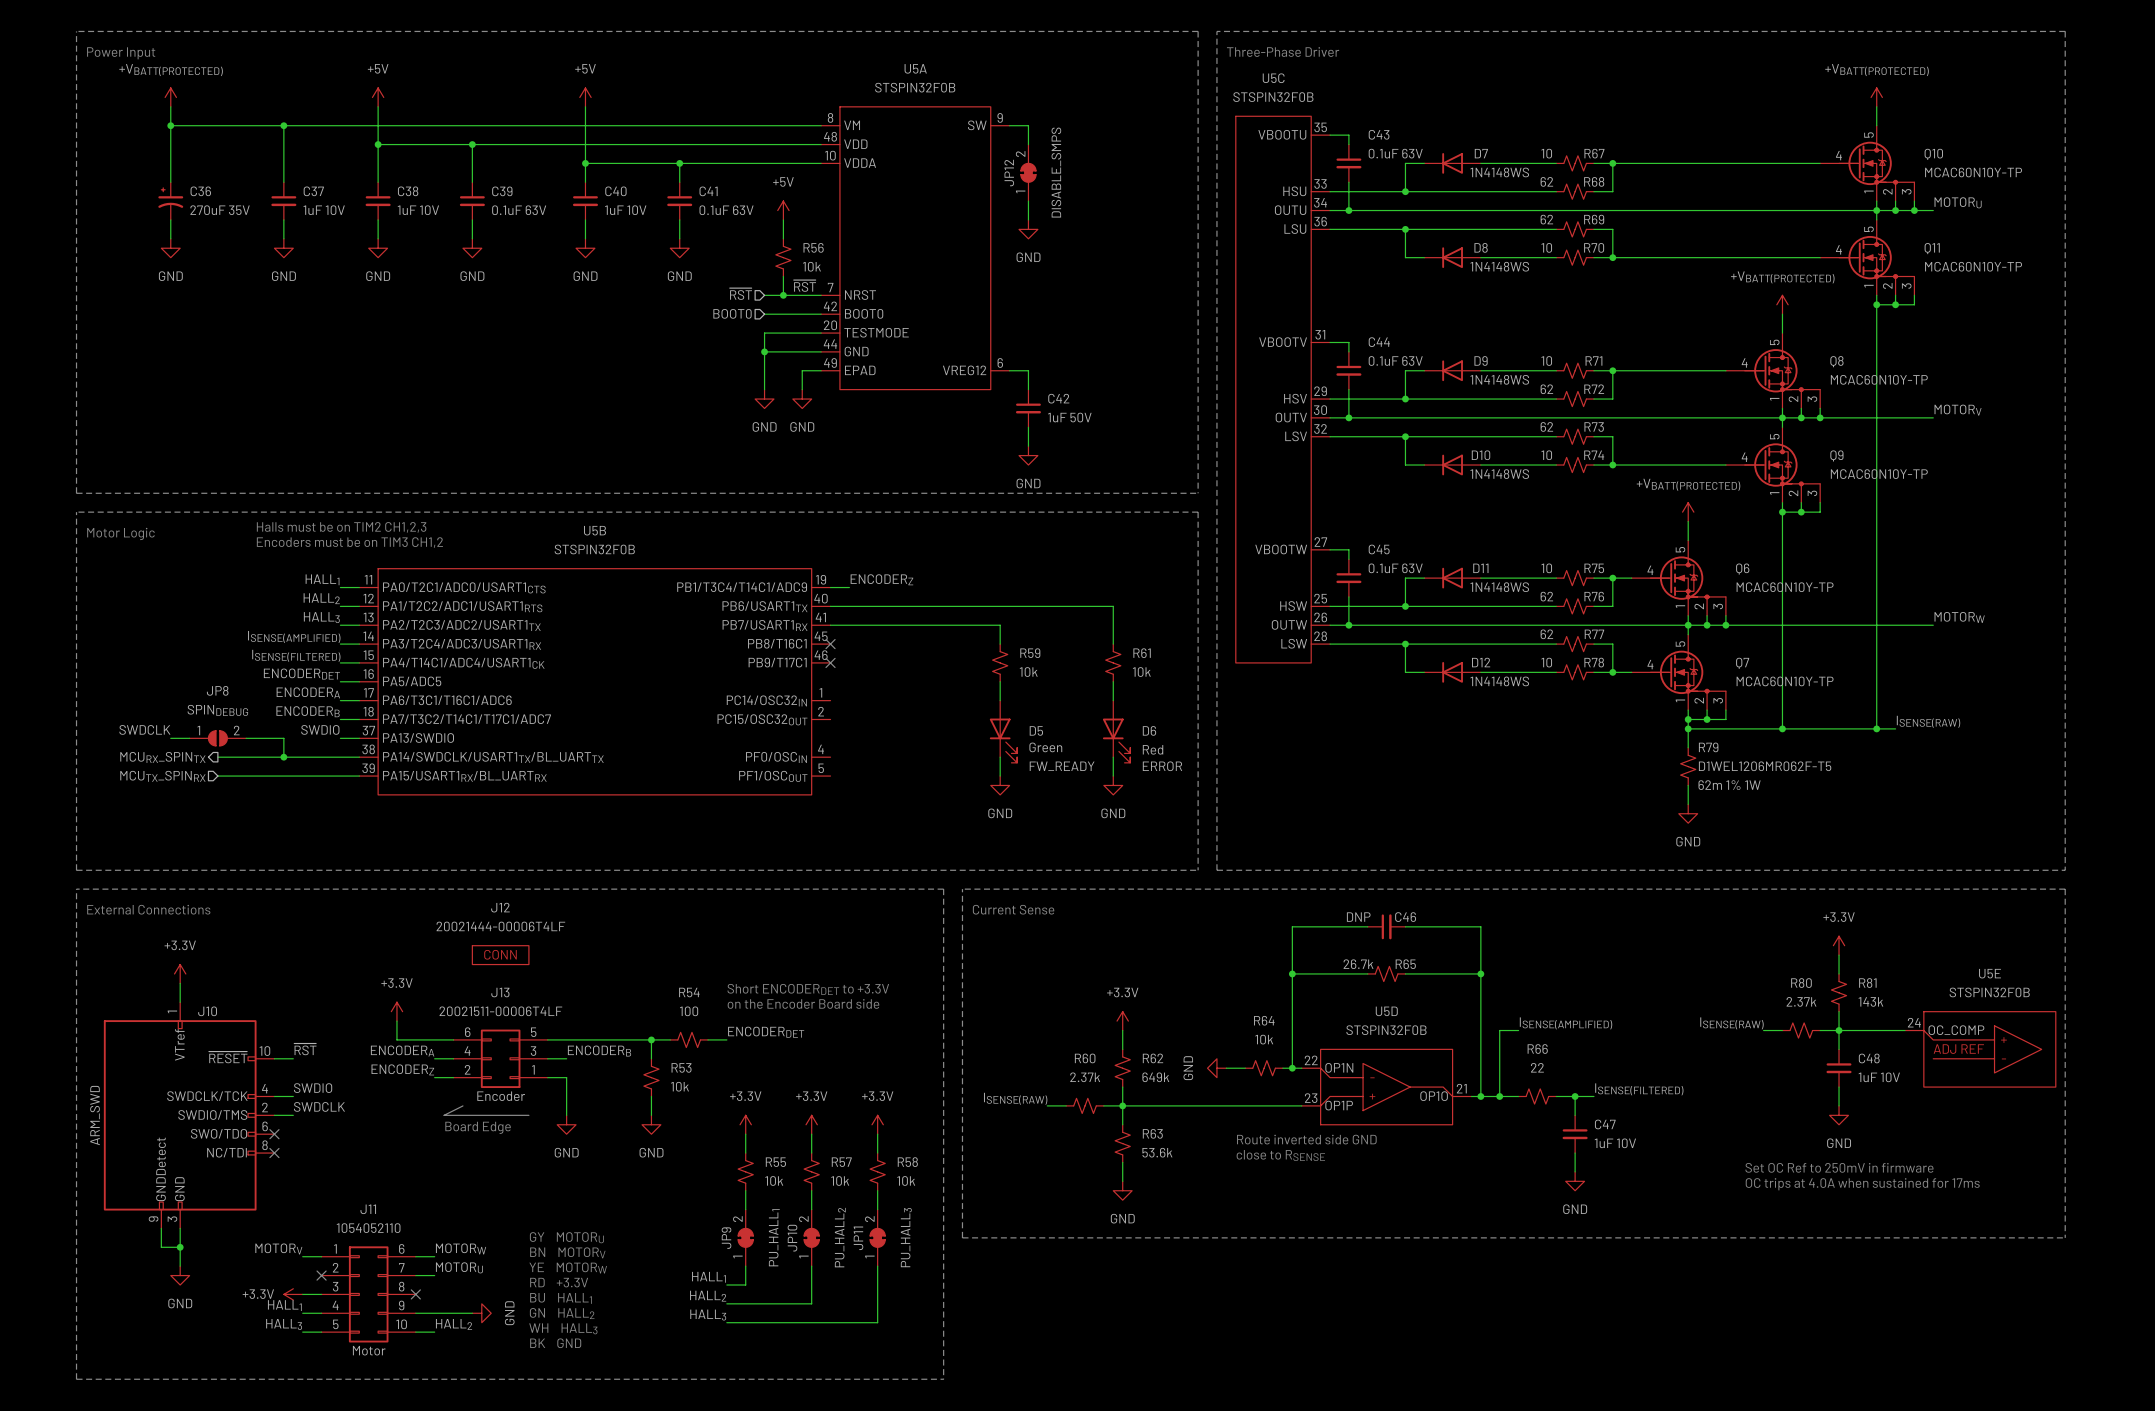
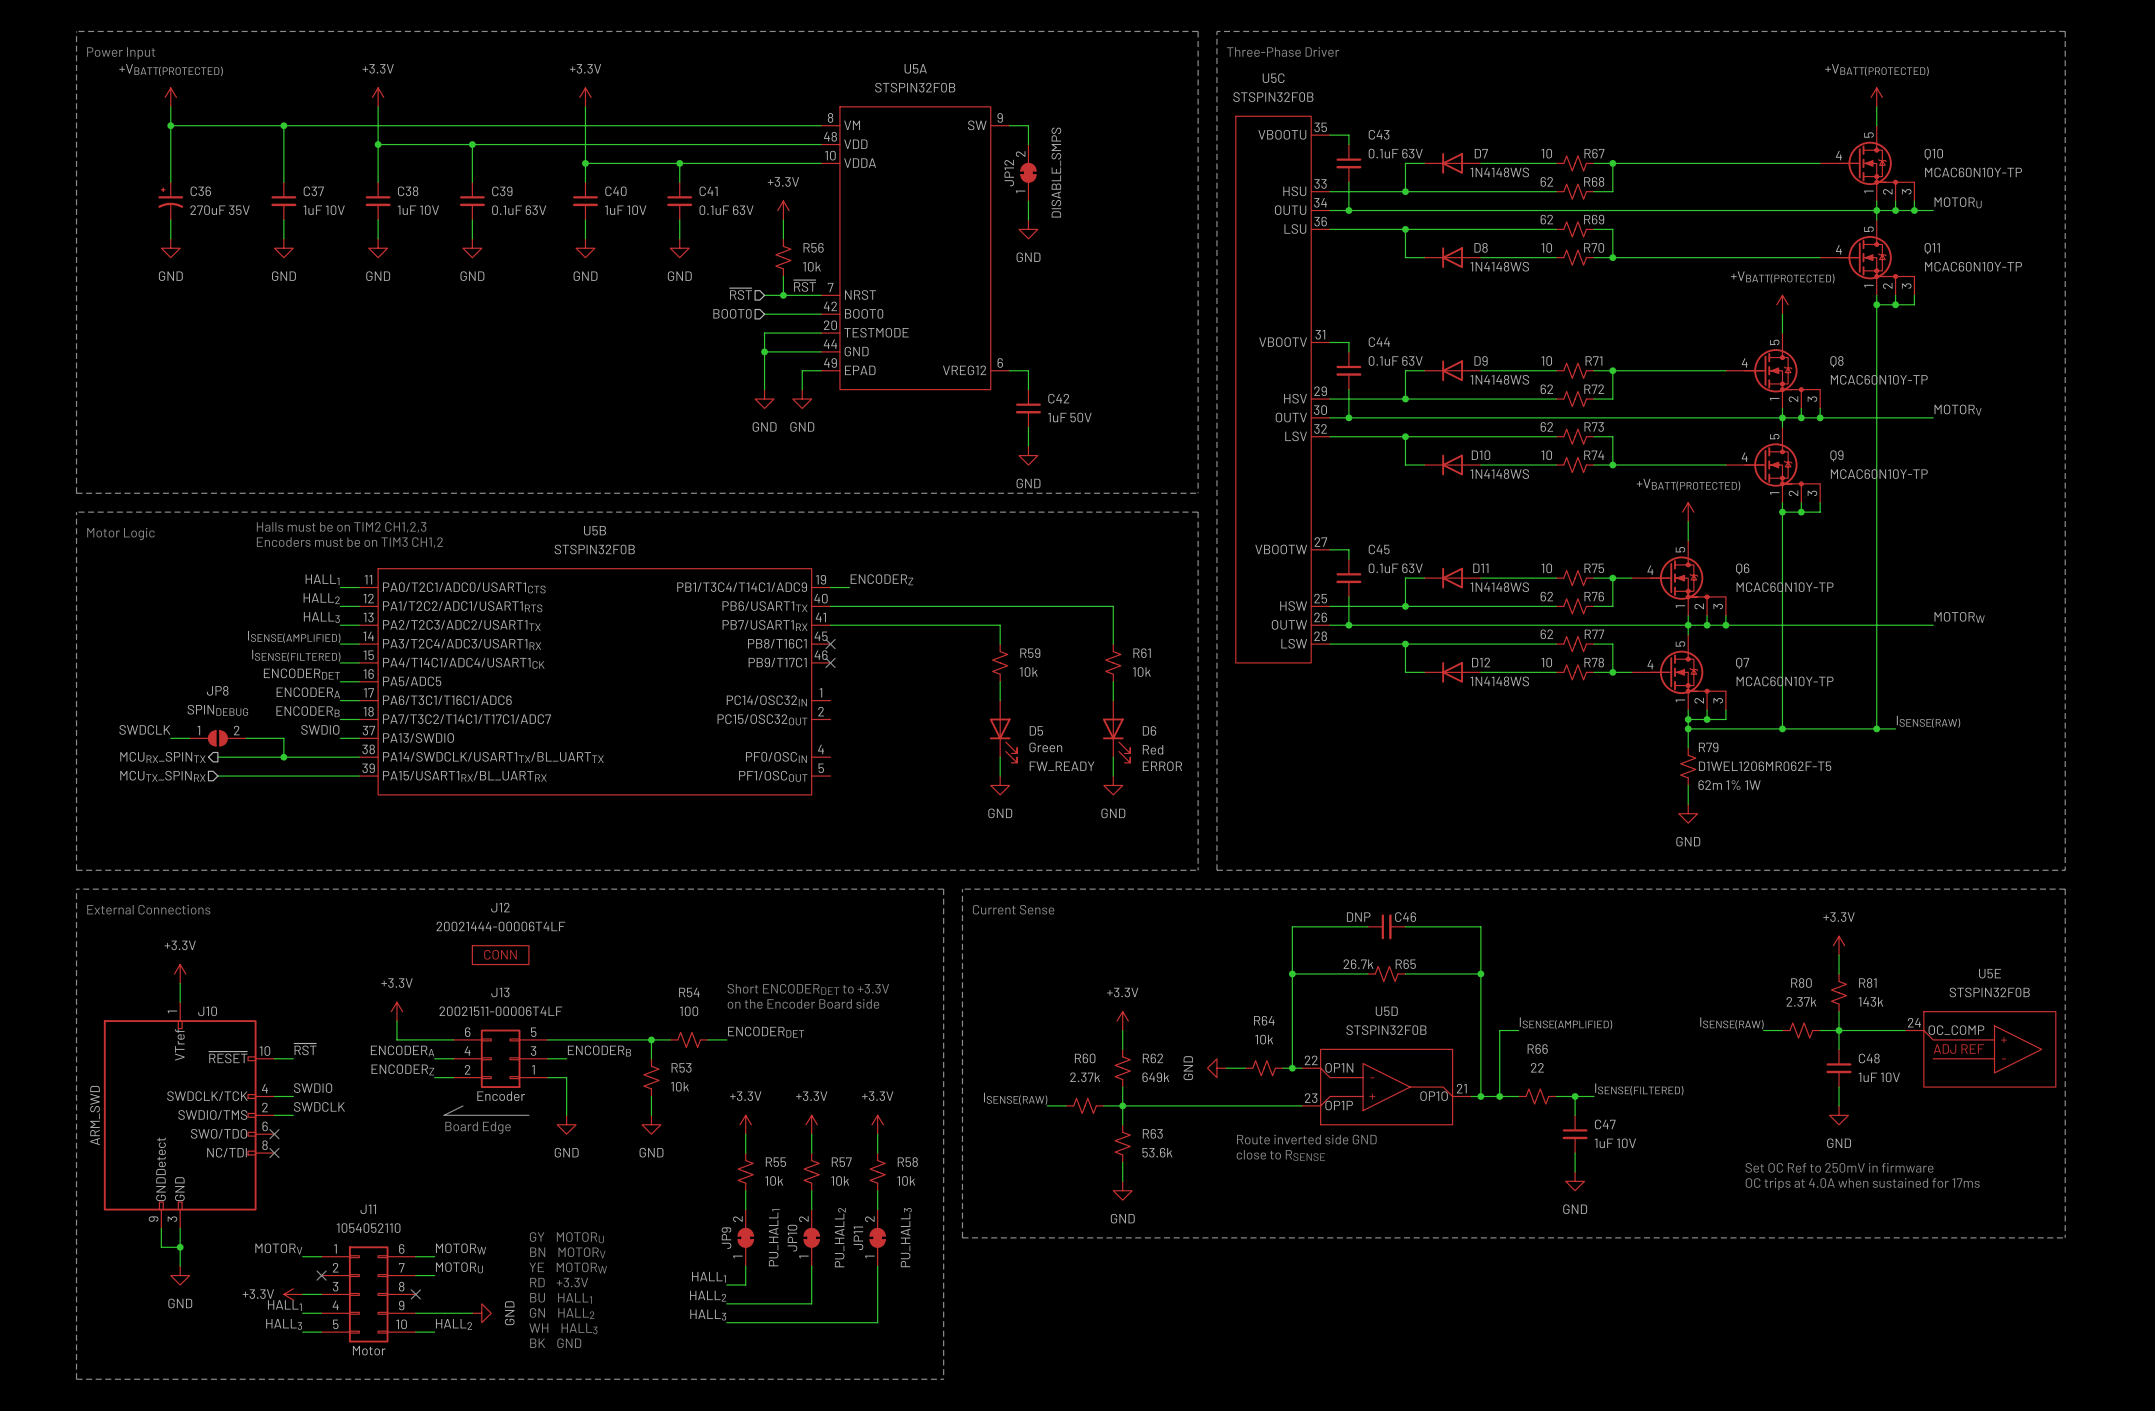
power symbol: +5V (378, 97) -> +3.3V (378, 97)
power symbol: +5V (585, 97) -> +3.3V (585, 97)
power symbol: +5V (783, 210) -> +3.3V (783, 210)

